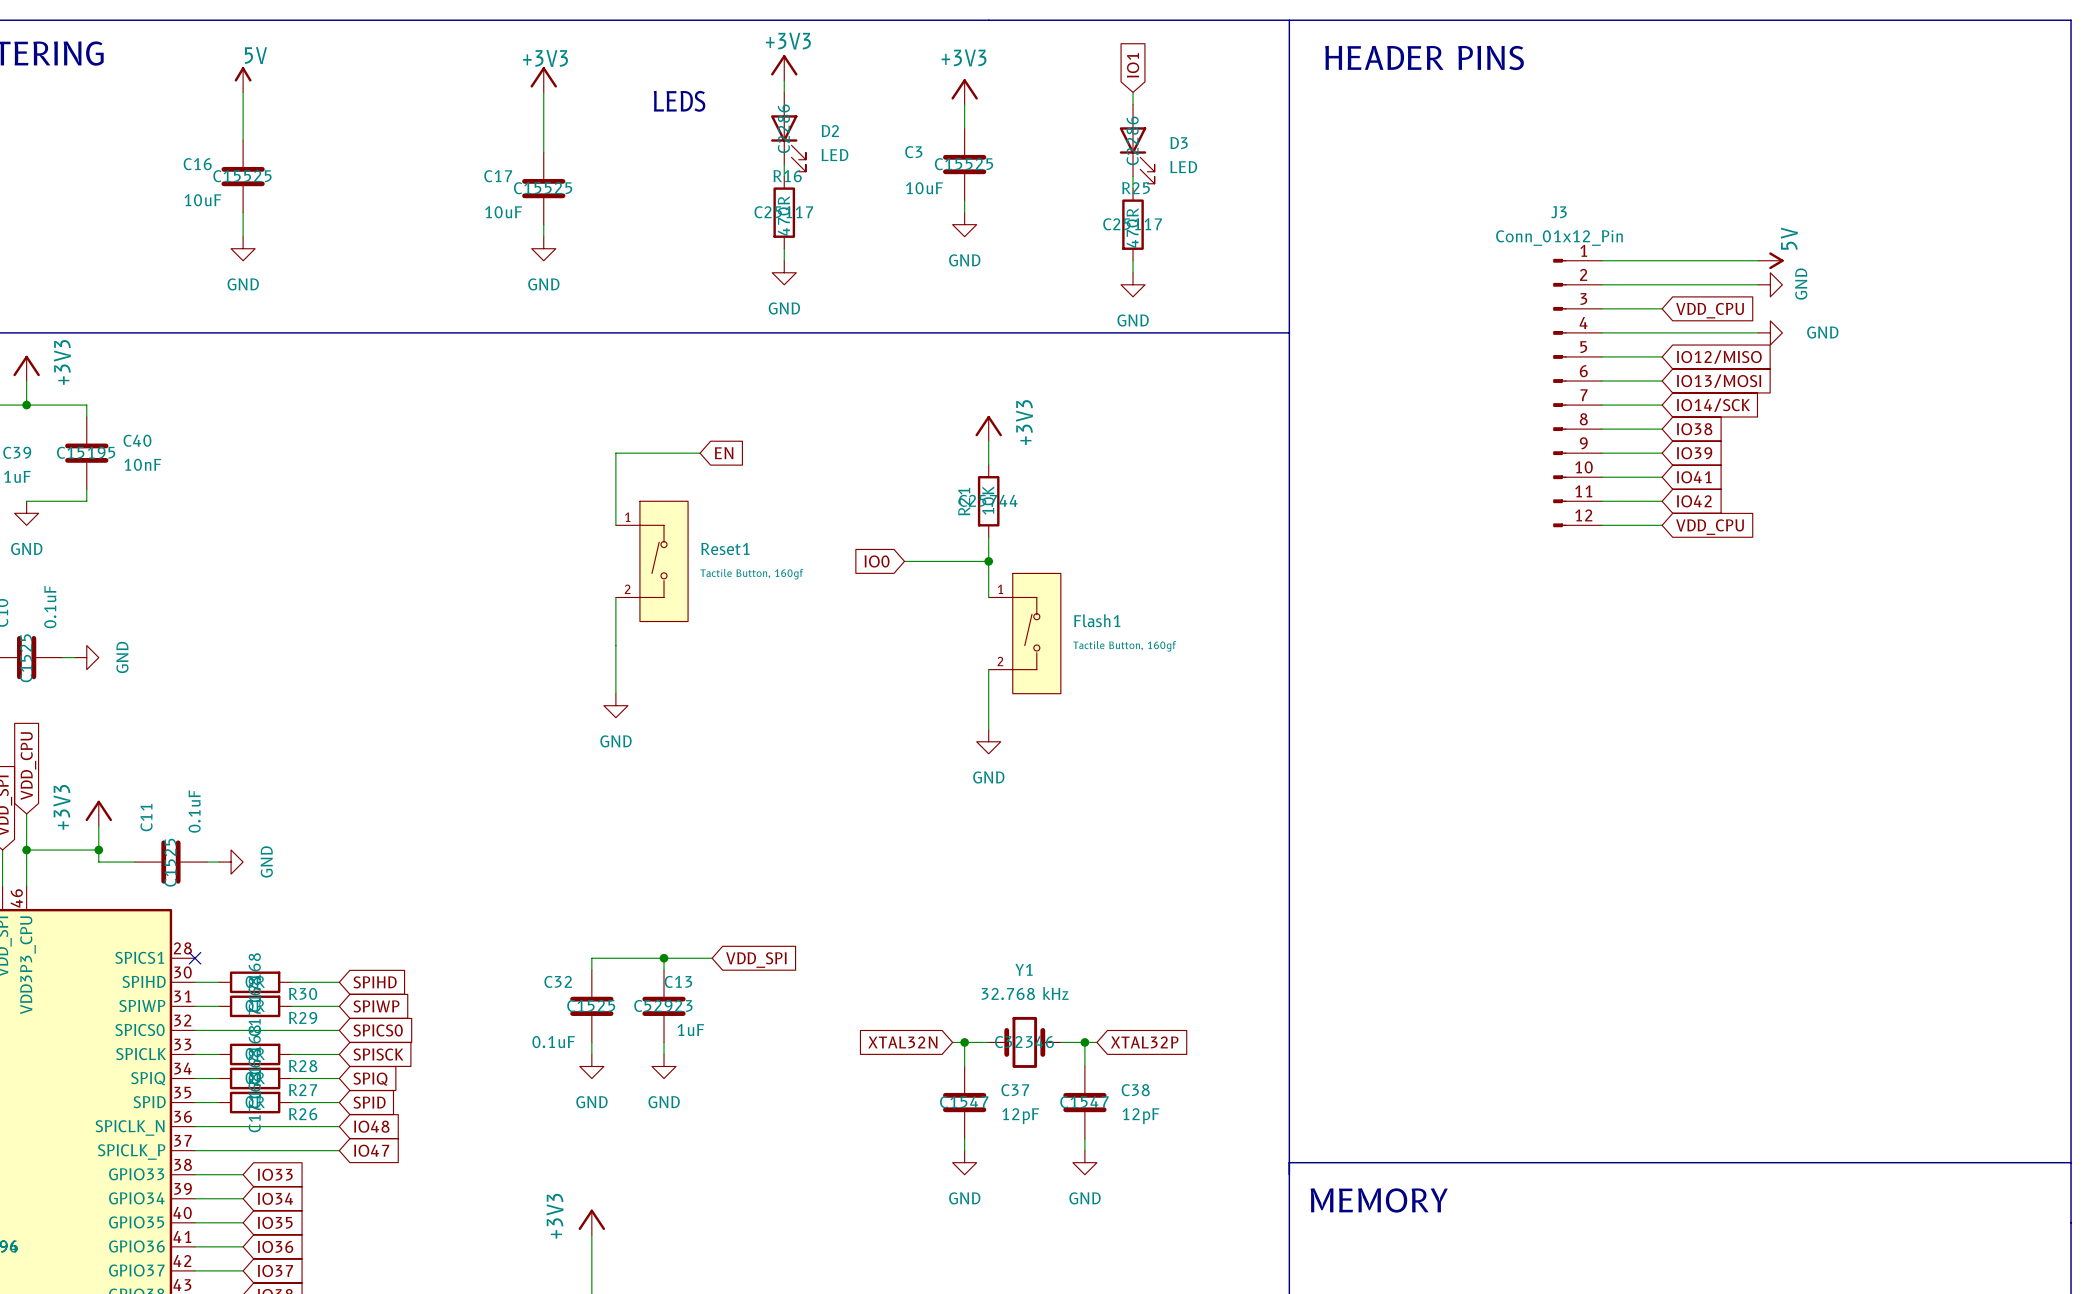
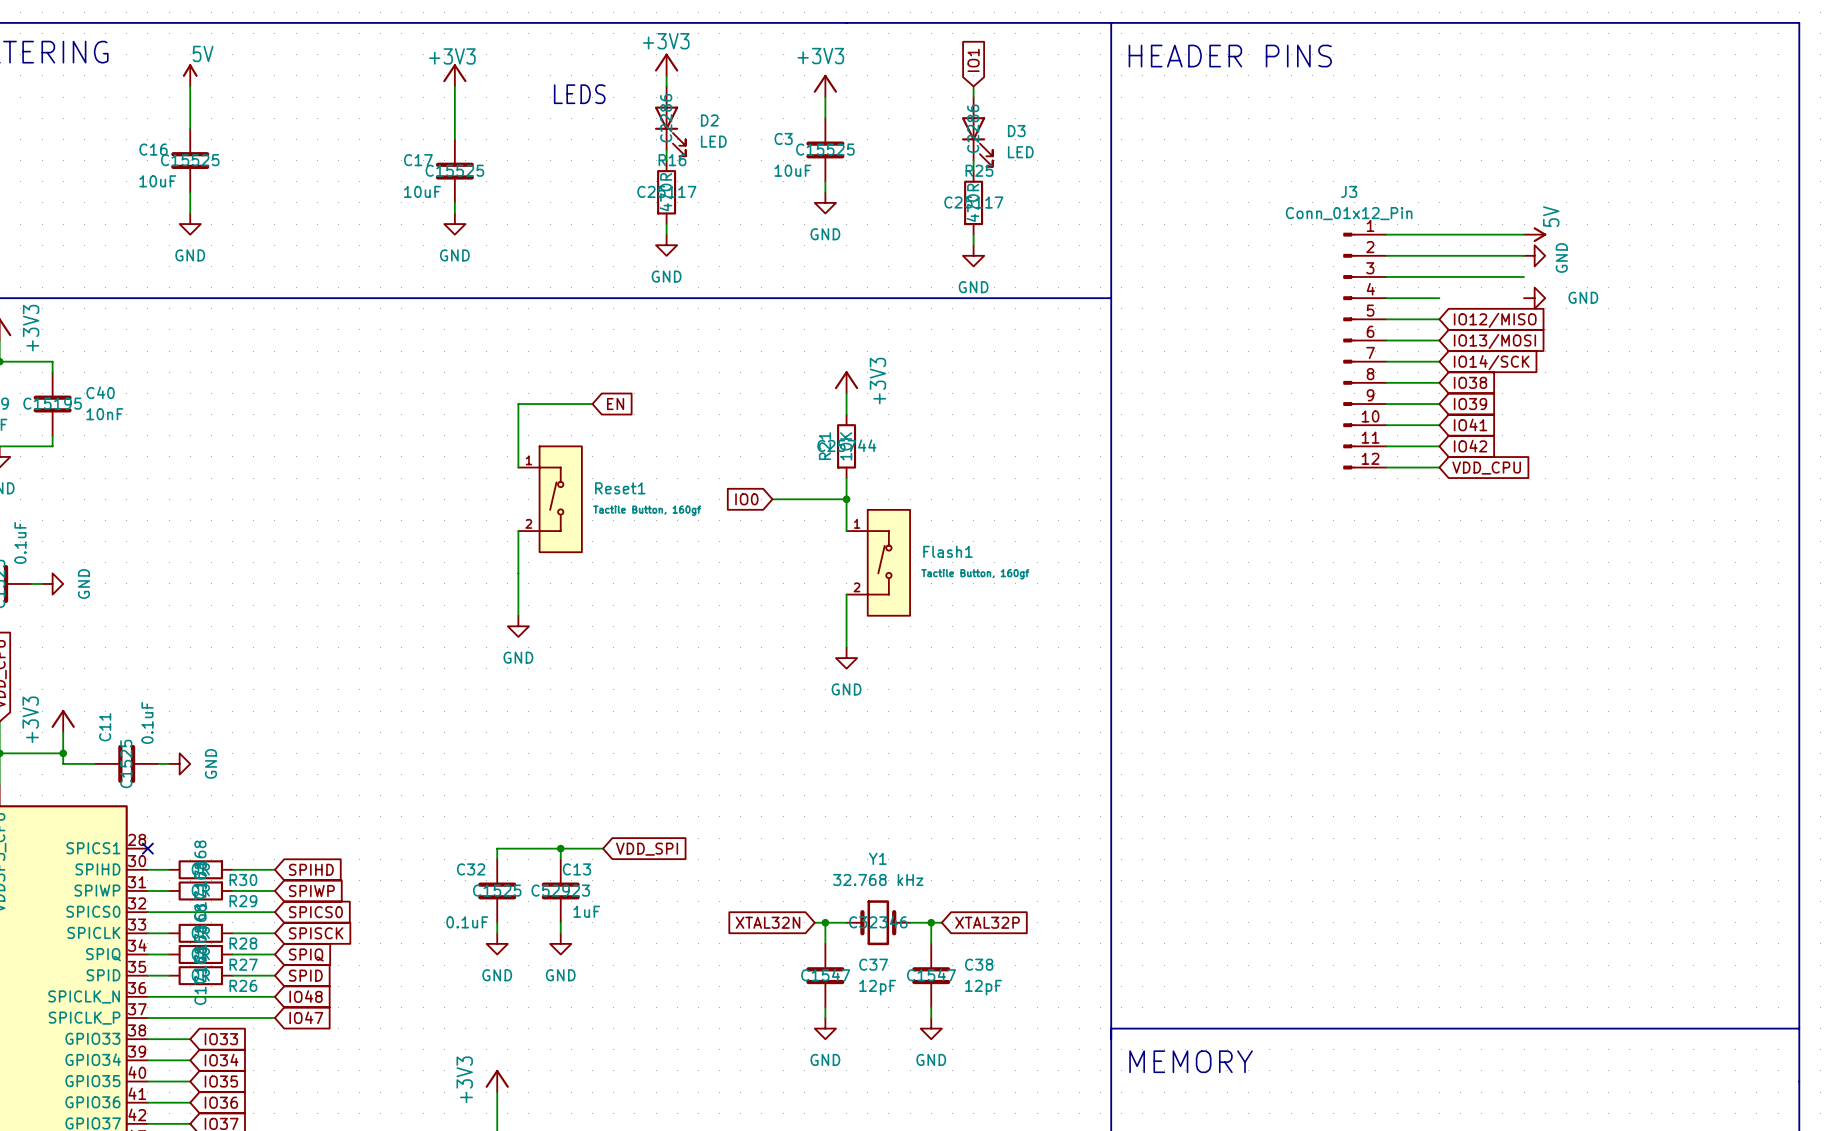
global label: VDD_CPU (1710, 310) -> none
wire: (1662, 332) (1758, 332) -> (1439, 276) (1524, 276)

